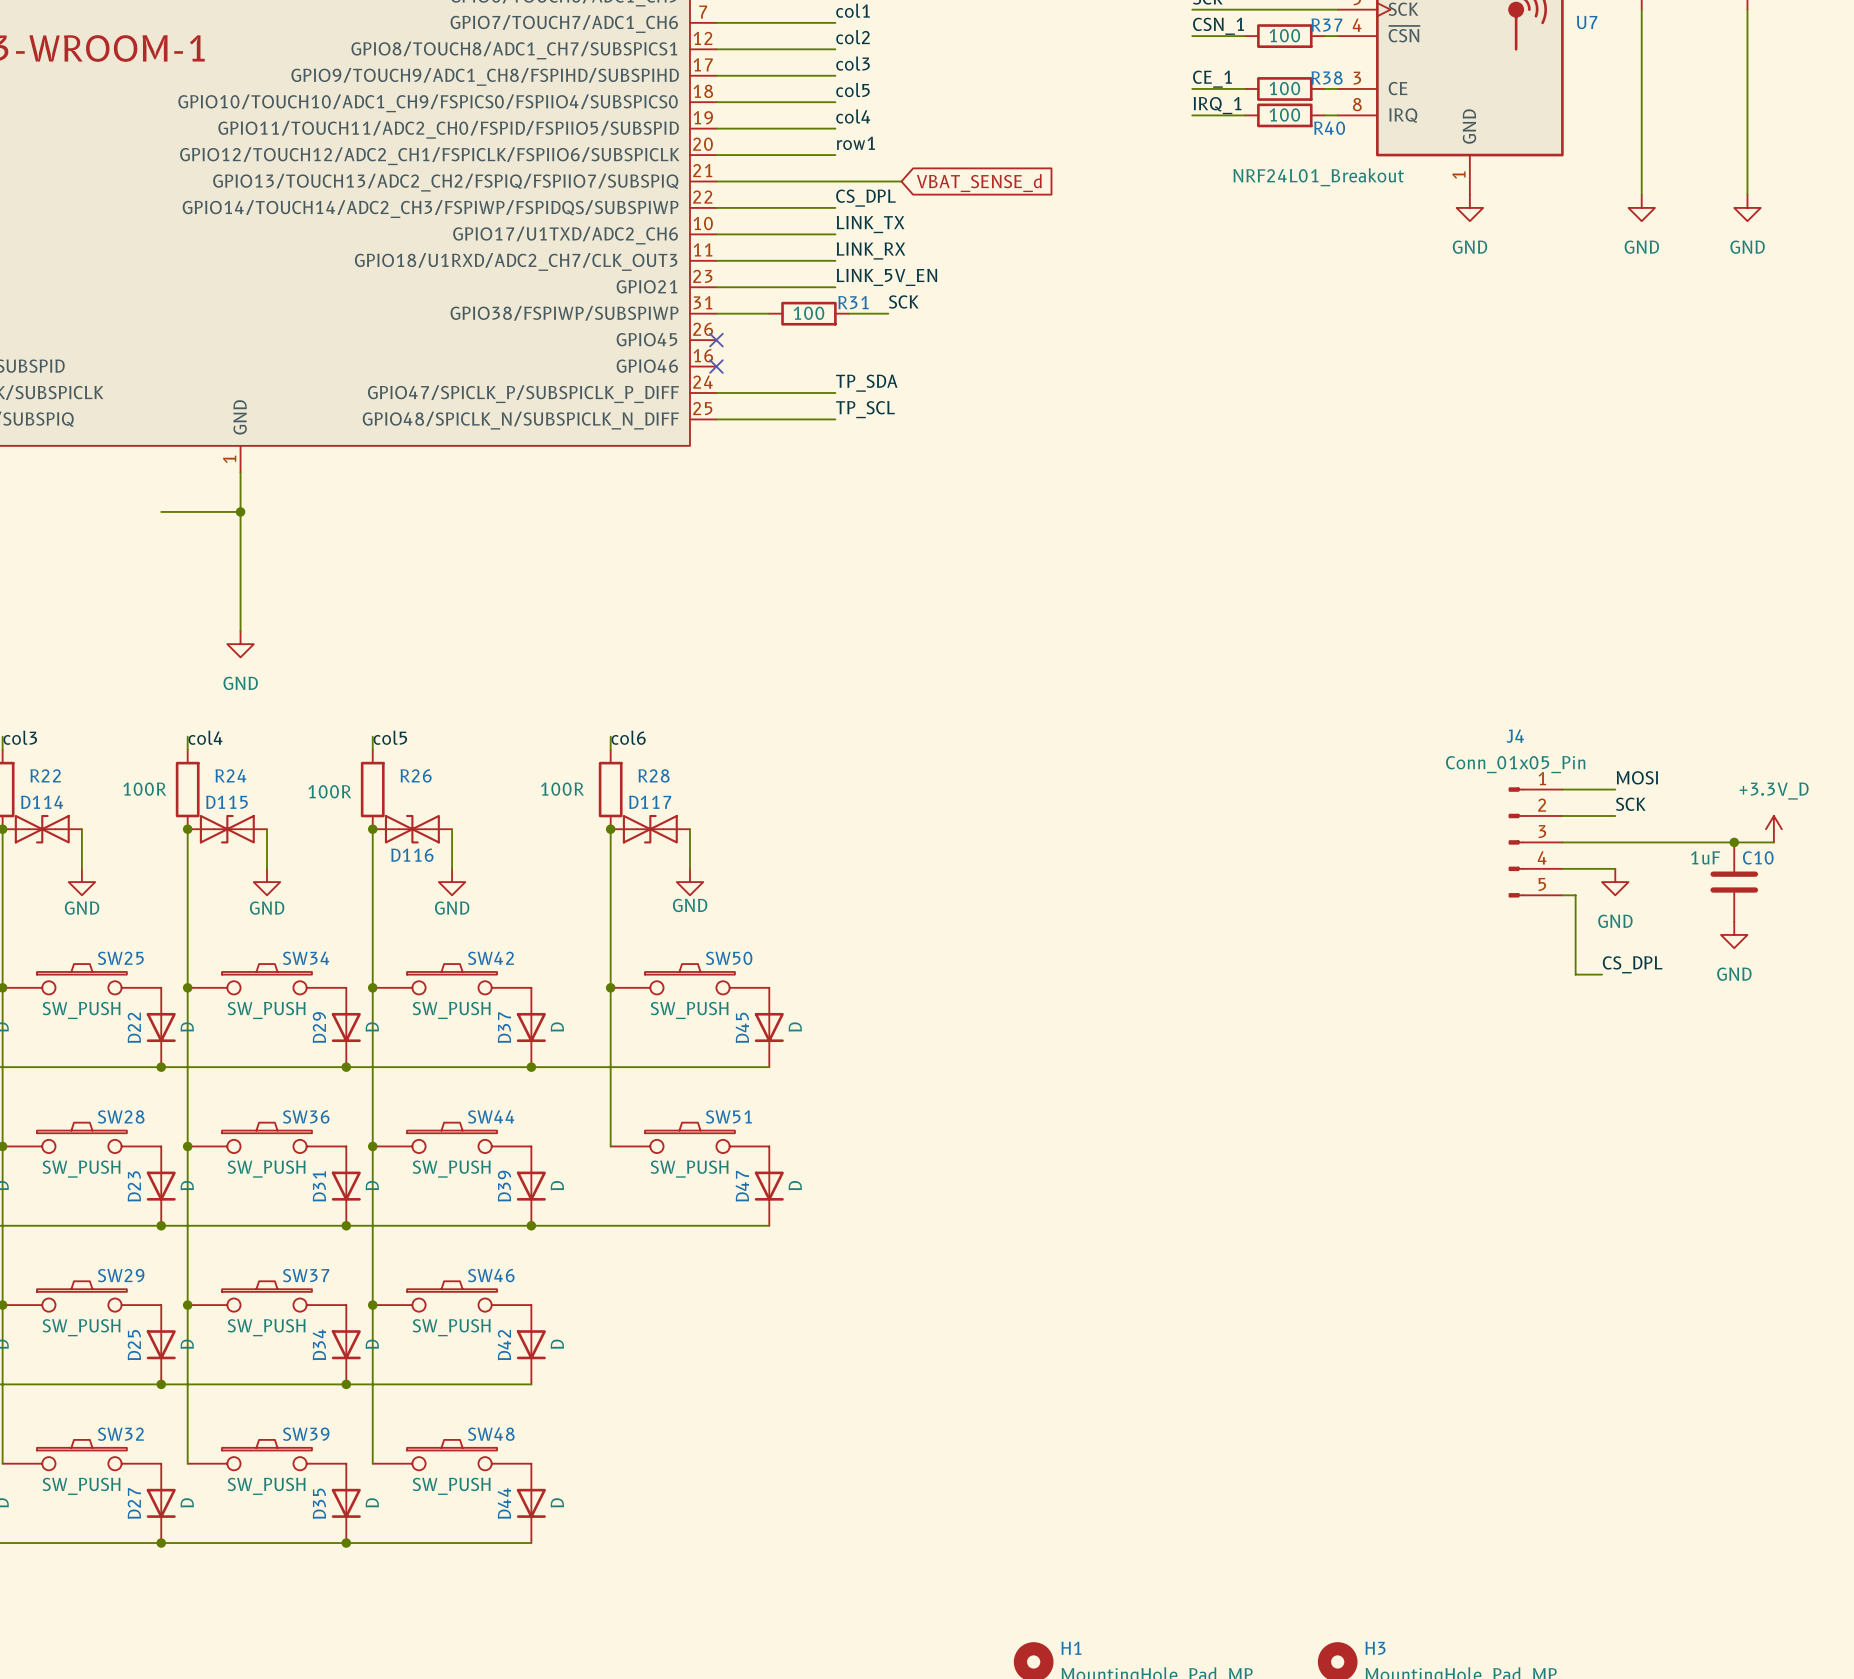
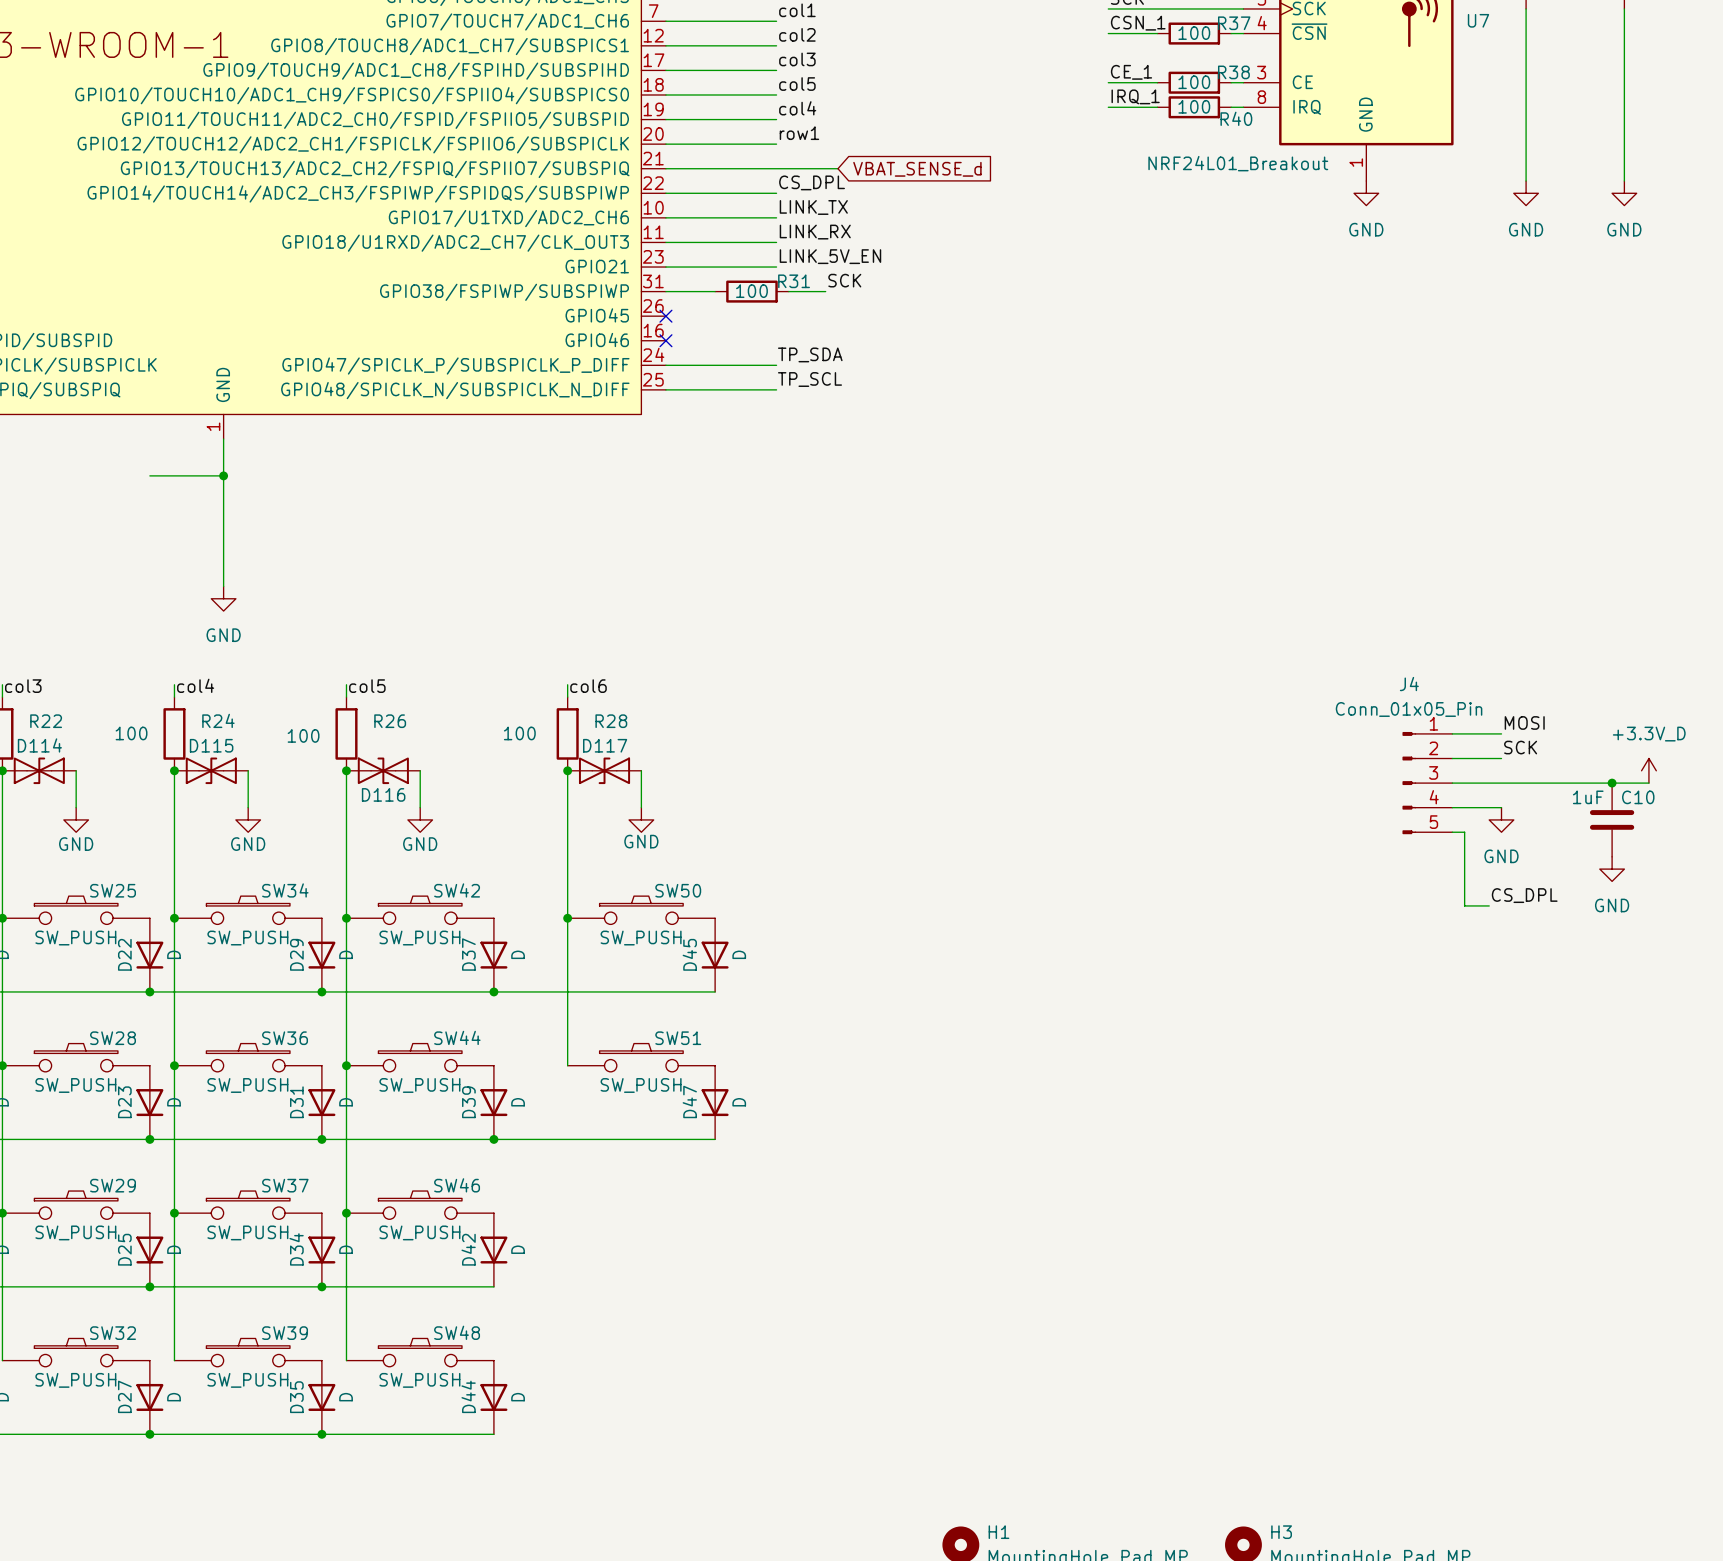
R24 value: 100R (144, 789) -> 100 (131, 733)
R28 value: 100R (562, 789) -> 100 (519, 733)
R26 value: 100R (329, 791) -> 100 (303, 735)

